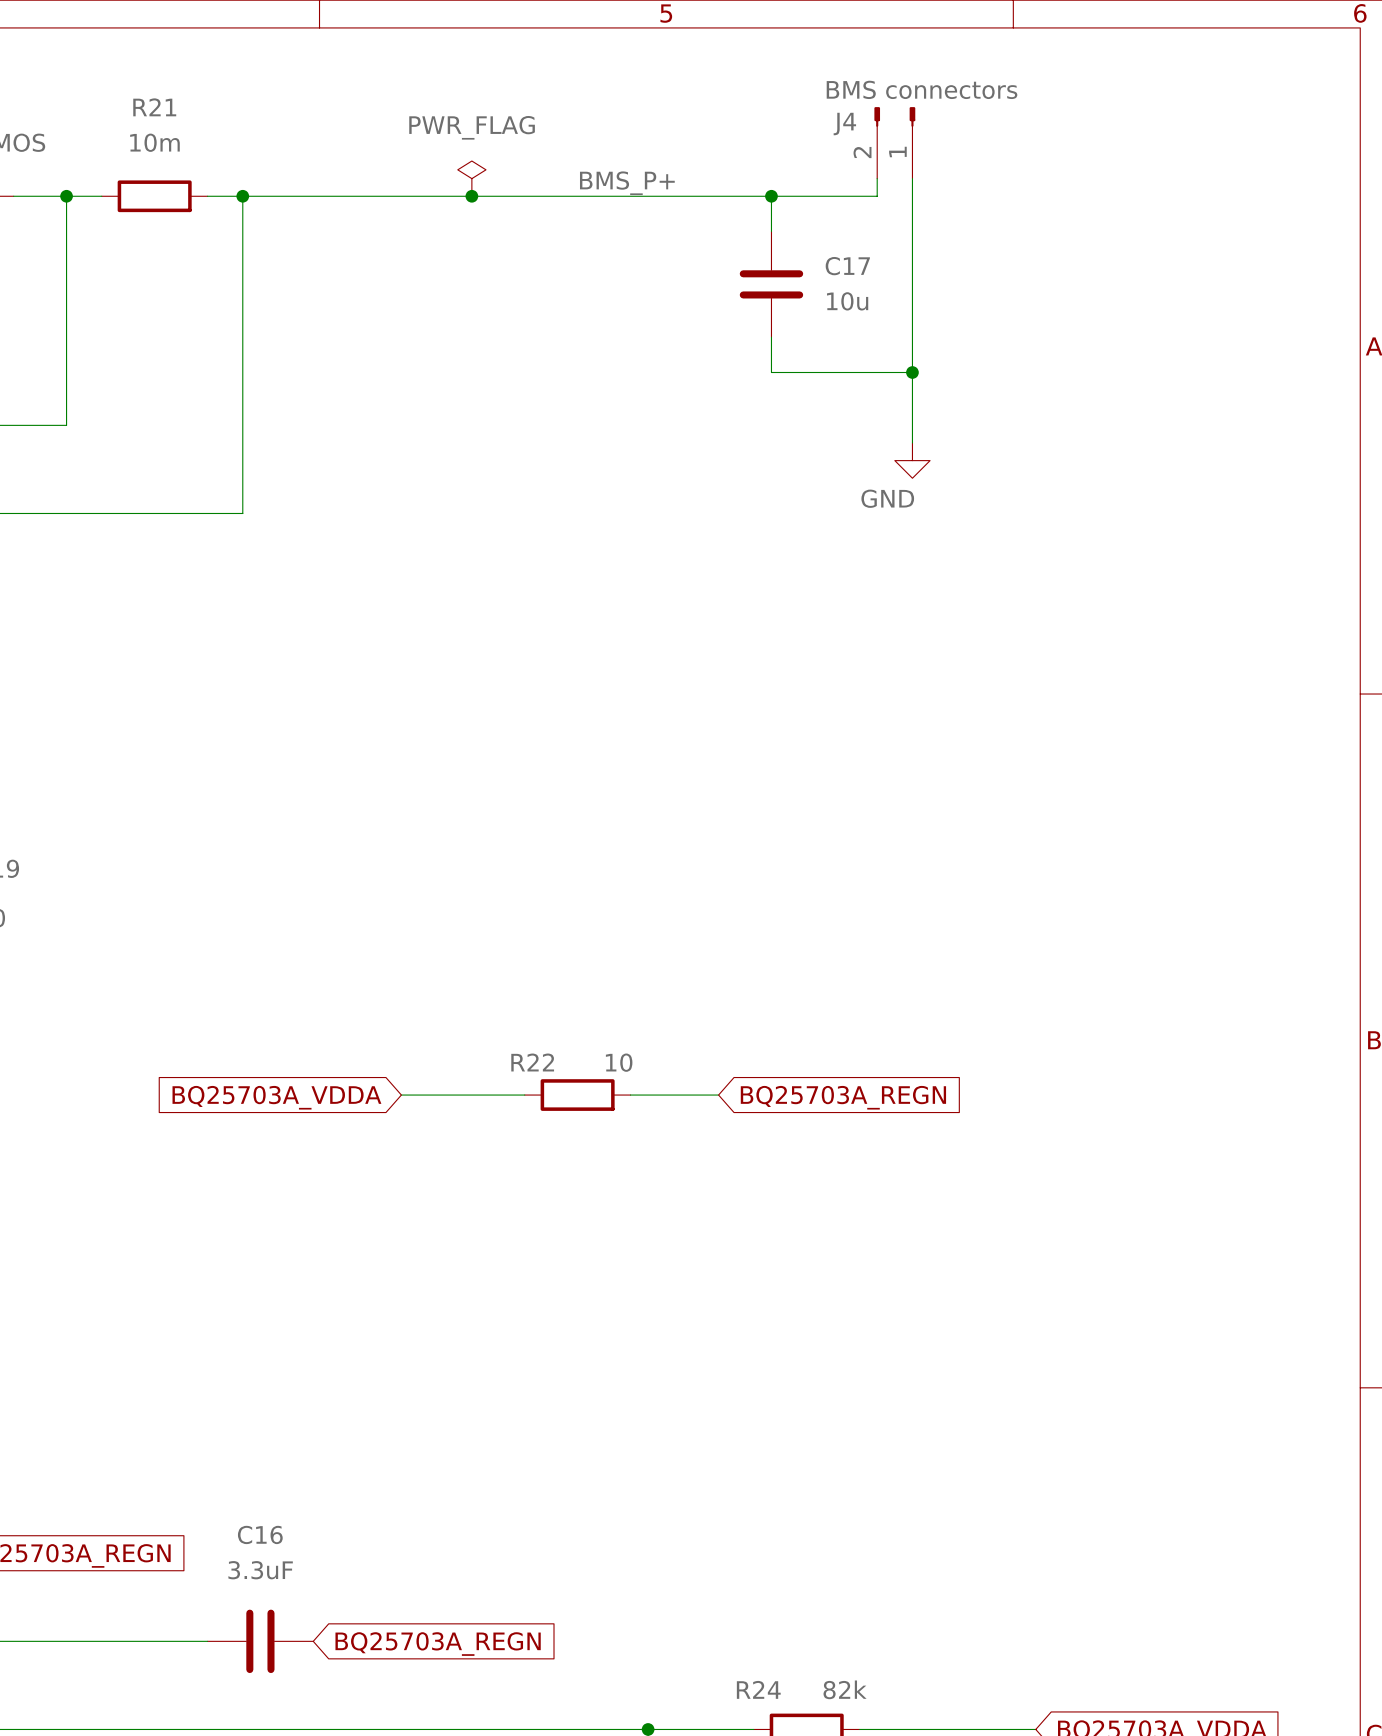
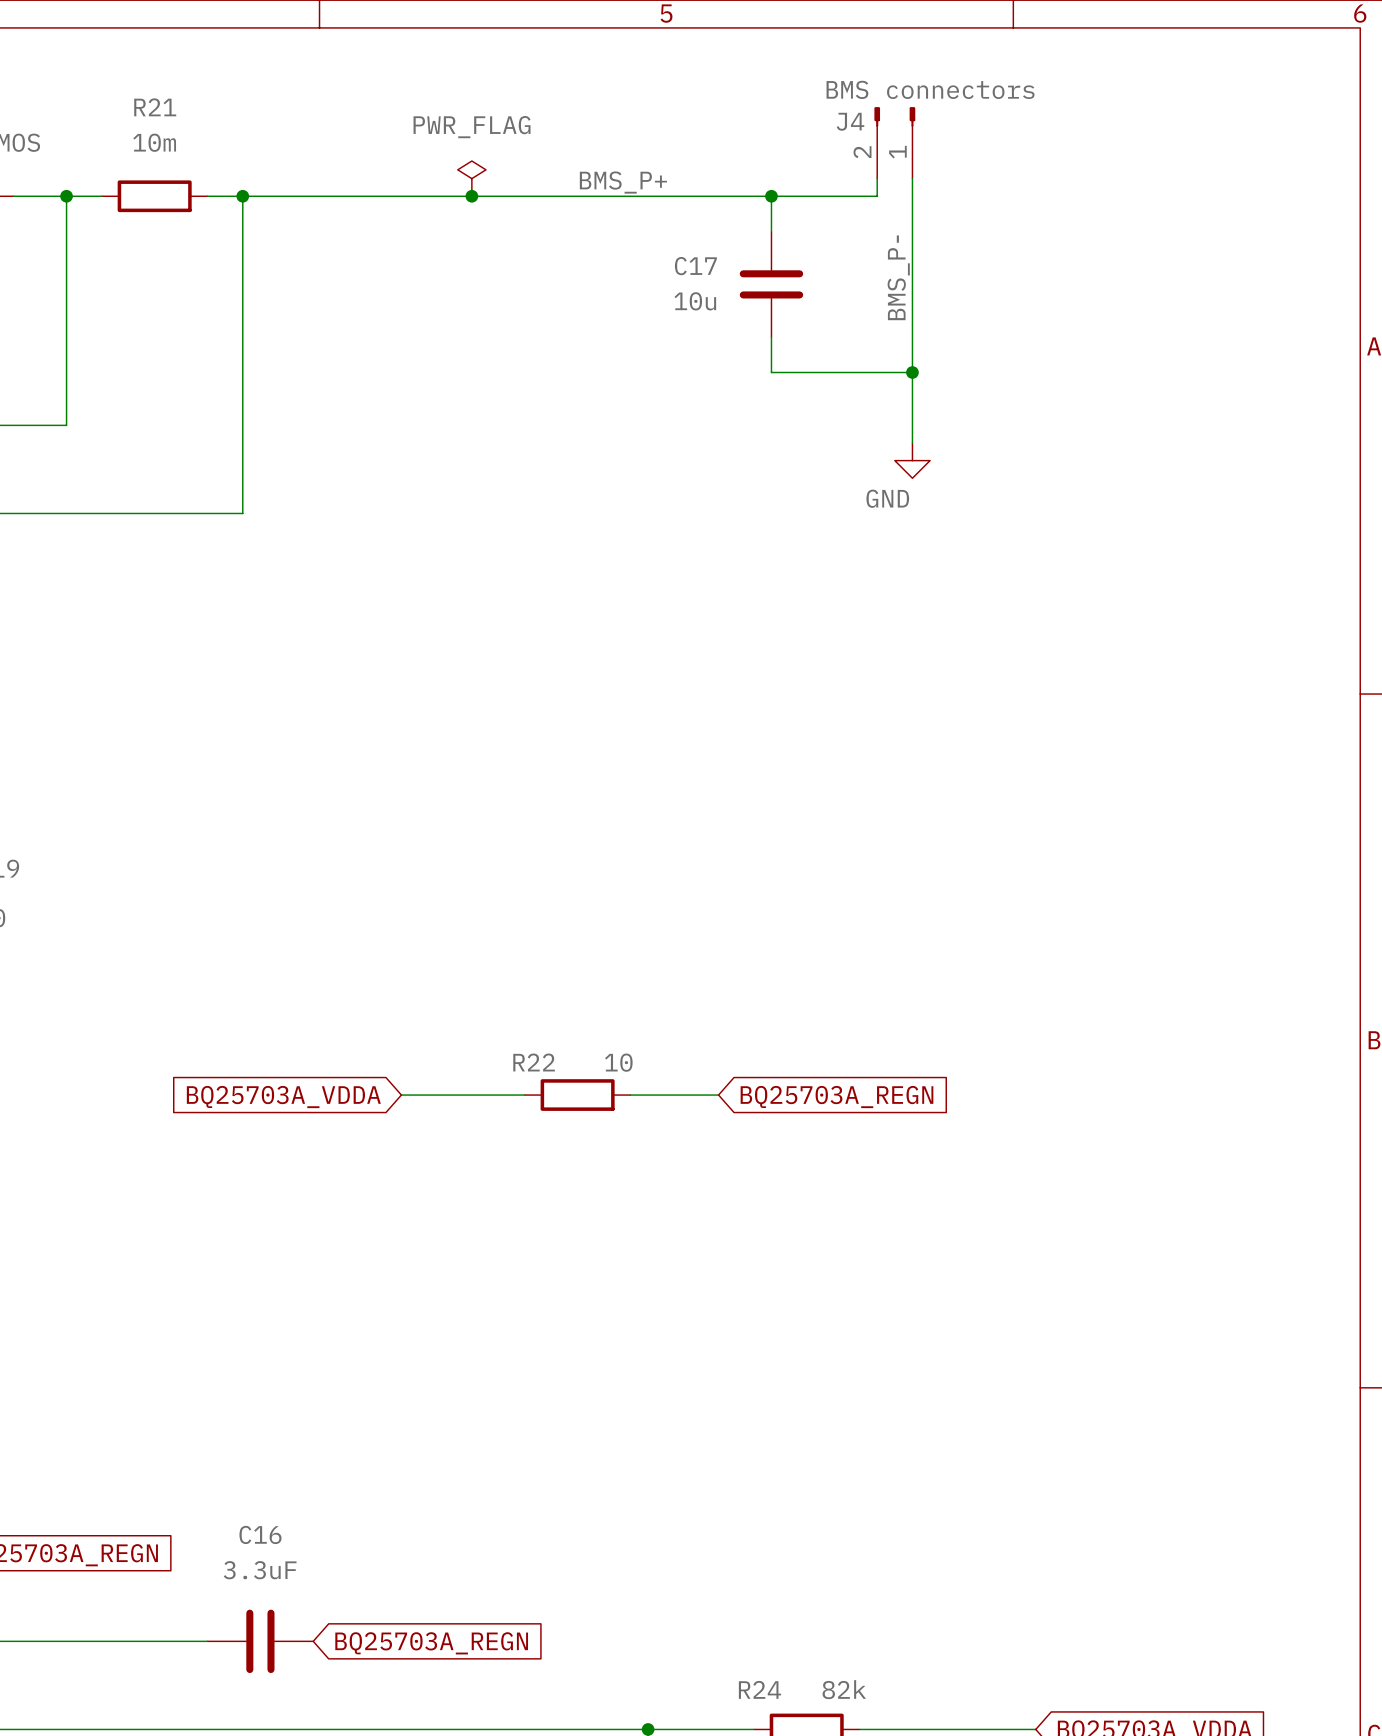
C17 name position: C17 (847, 266) -> C17 (695, 266)
label: none -> BMS_P- (898, 277)
C17 value position: 10u (847, 301) -> 10u (695, 301)

